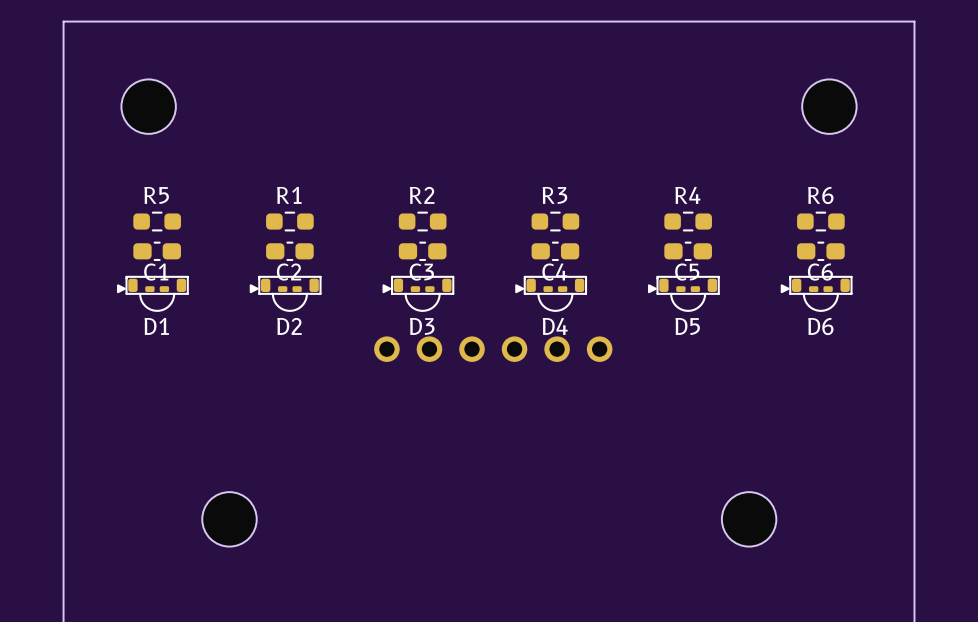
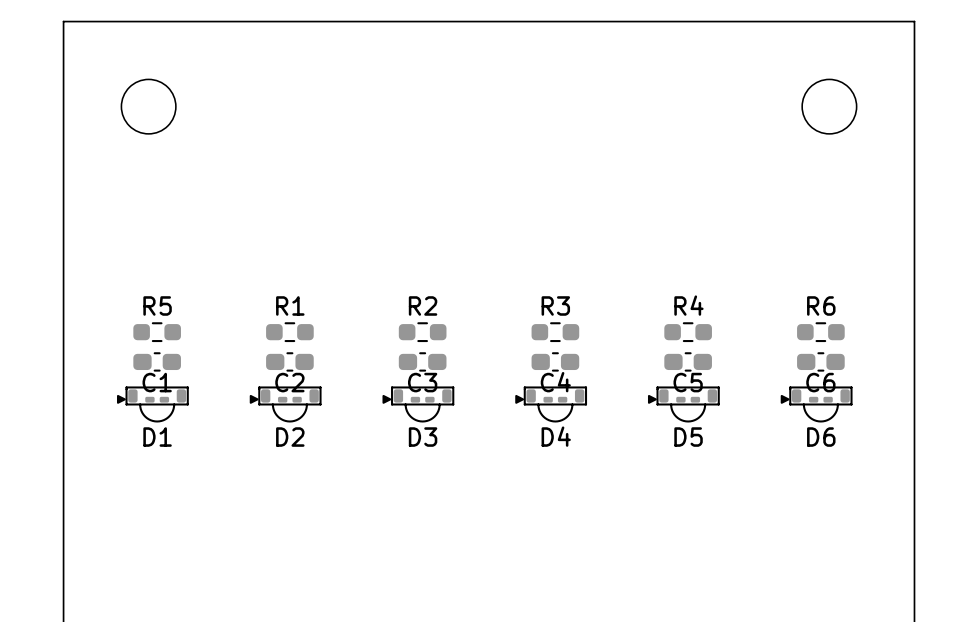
R5 position: (157, 221) -> (157, 332)
R1 position: (289, 221) -> (289, 332)
R2 position: (422, 221) -> (422, 332)
R3 position: (555, 221) -> (555, 332)
R4 position: (688, 221) -> (688, 332)
R6 position: (820, 221) -> (820, 332)
C1 position: (157, 251) -> (157, 361)
C2 position: (289, 251) -> (289, 361)
C3 position: (422, 251) -> (422, 361)
C4 position: (555, 251) -> (555, 361)
C5 position: (688, 251) -> (688, 361)
C6 position: (820, 251) -> (820, 361)
D1 position: (152, 293) -> (152, 404)
D2 position: (285, 293) -> (285, 404)
D3 position: (418, 293) -> (418, 404)
D4 position: (551, 293) -> (551, 404)
D5 position: (683, 293) -> (683, 404)
D6 position: (816, 293) -> (816, 404)
part: (493, 349) -> none
part: (229, 519) -> none
part: (749, 519) -> none

